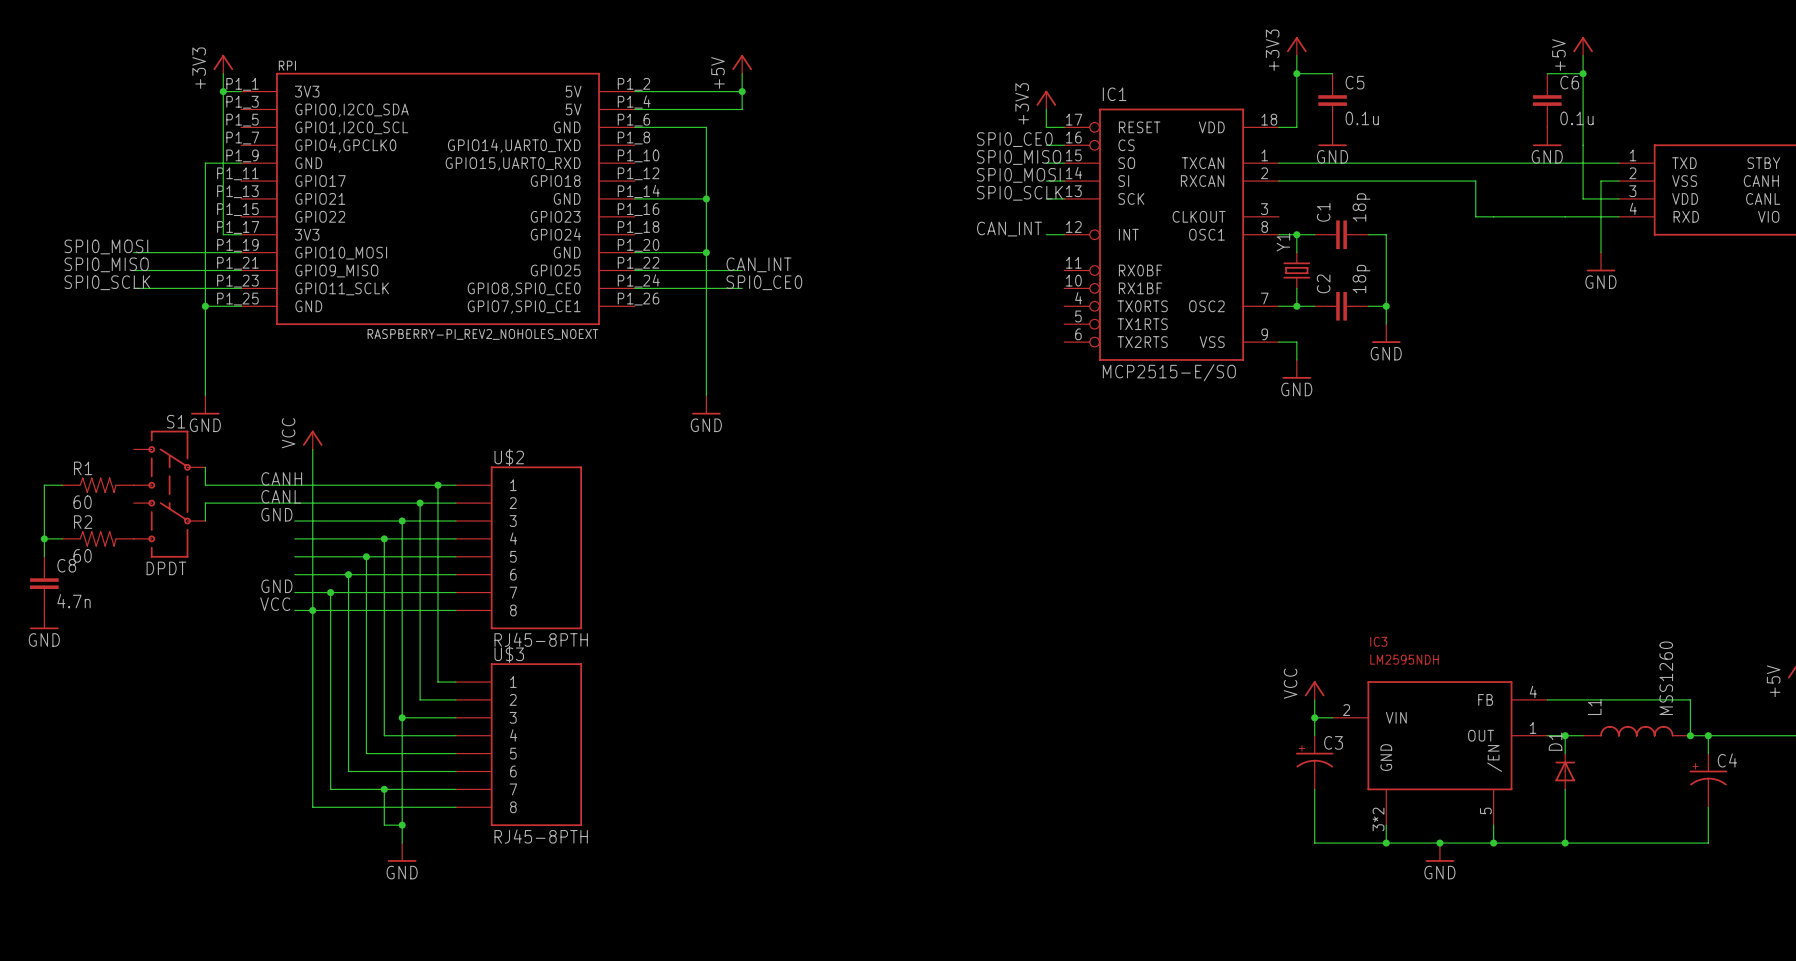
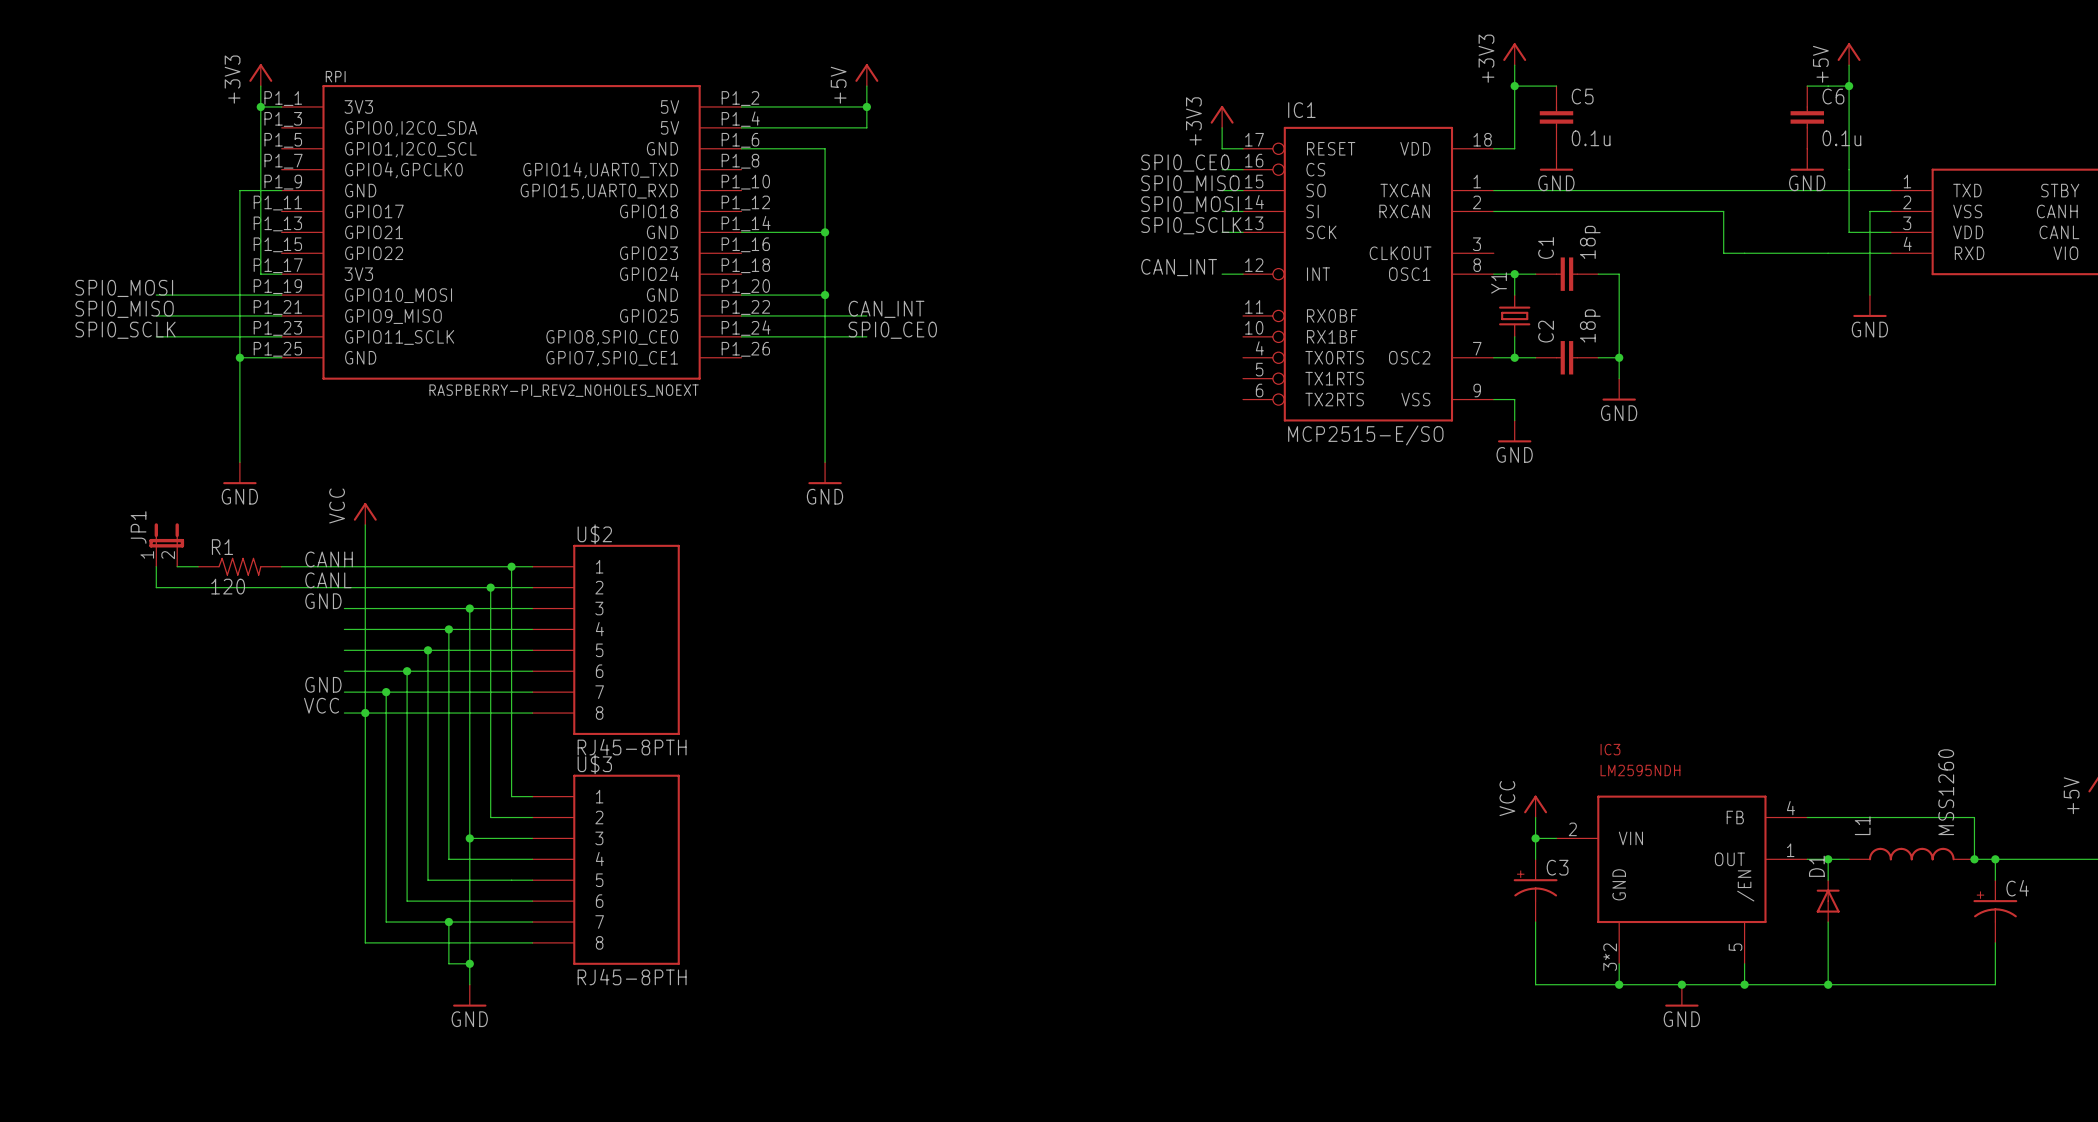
JP1: none -> (166, 545)
wire: (205, 467) (205, 485) (241, 485) -> none
wire: (62, 485) (44, 485) (44, 556) -> none
R1 position: (98, 485) -> (239, 566)
S1: DPDT (169, 494) -> none
R1 value: 60 (82, 502) -> 120 (228, 586)
wire: (205, 503) (205, 521) -> (239, 587) (156, 587) (156, 566)
wire: (44, 538) (62, 538) -> (177, 566) (198, 566)
junction: (44, 538) -> none
R2: 60 (98, 538) -> none
C8: 4.7n (44, 583) -> none
power symbol: GND (44, 619) -> none

